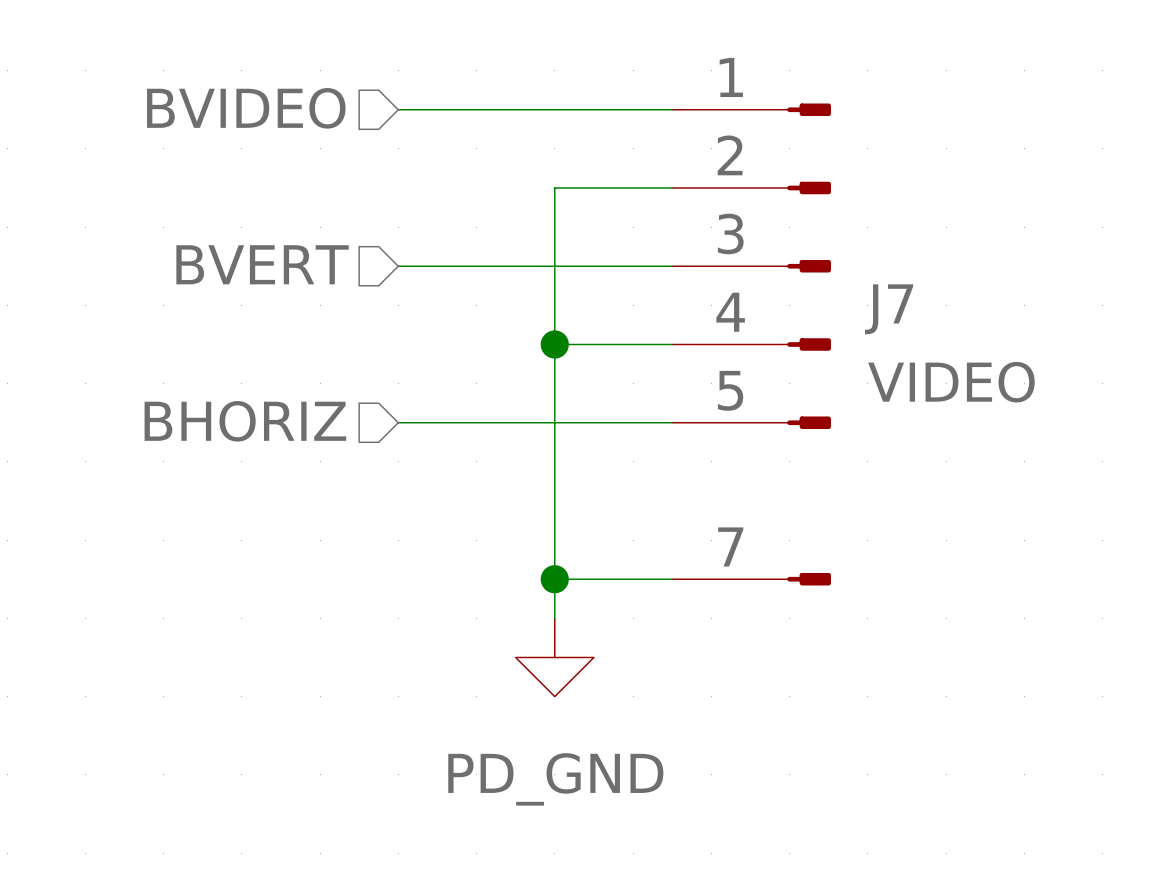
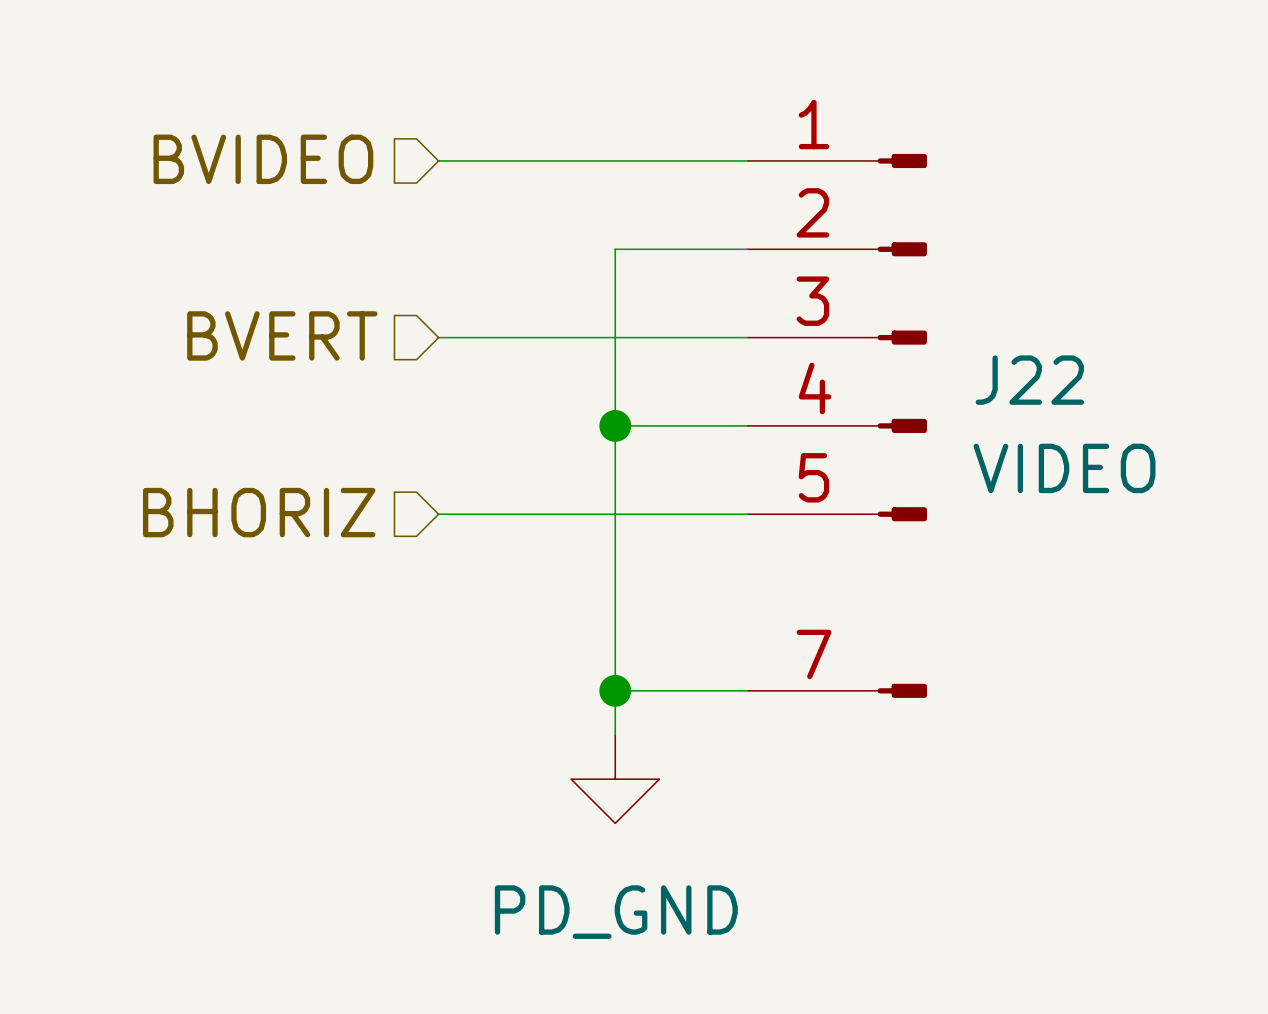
J7 name: J7 (889, 309) -> J22 (1029, 380)

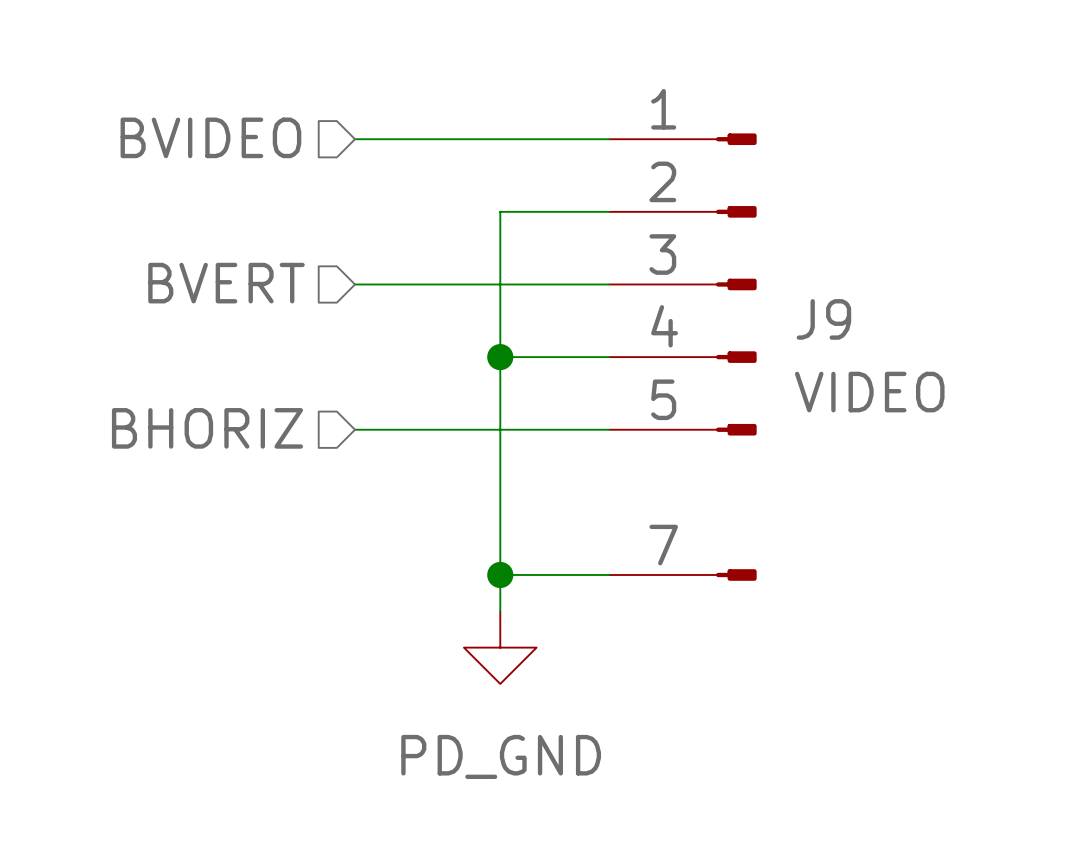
J22 name: J22 (1029, 380) -> J9 (823, 319)

